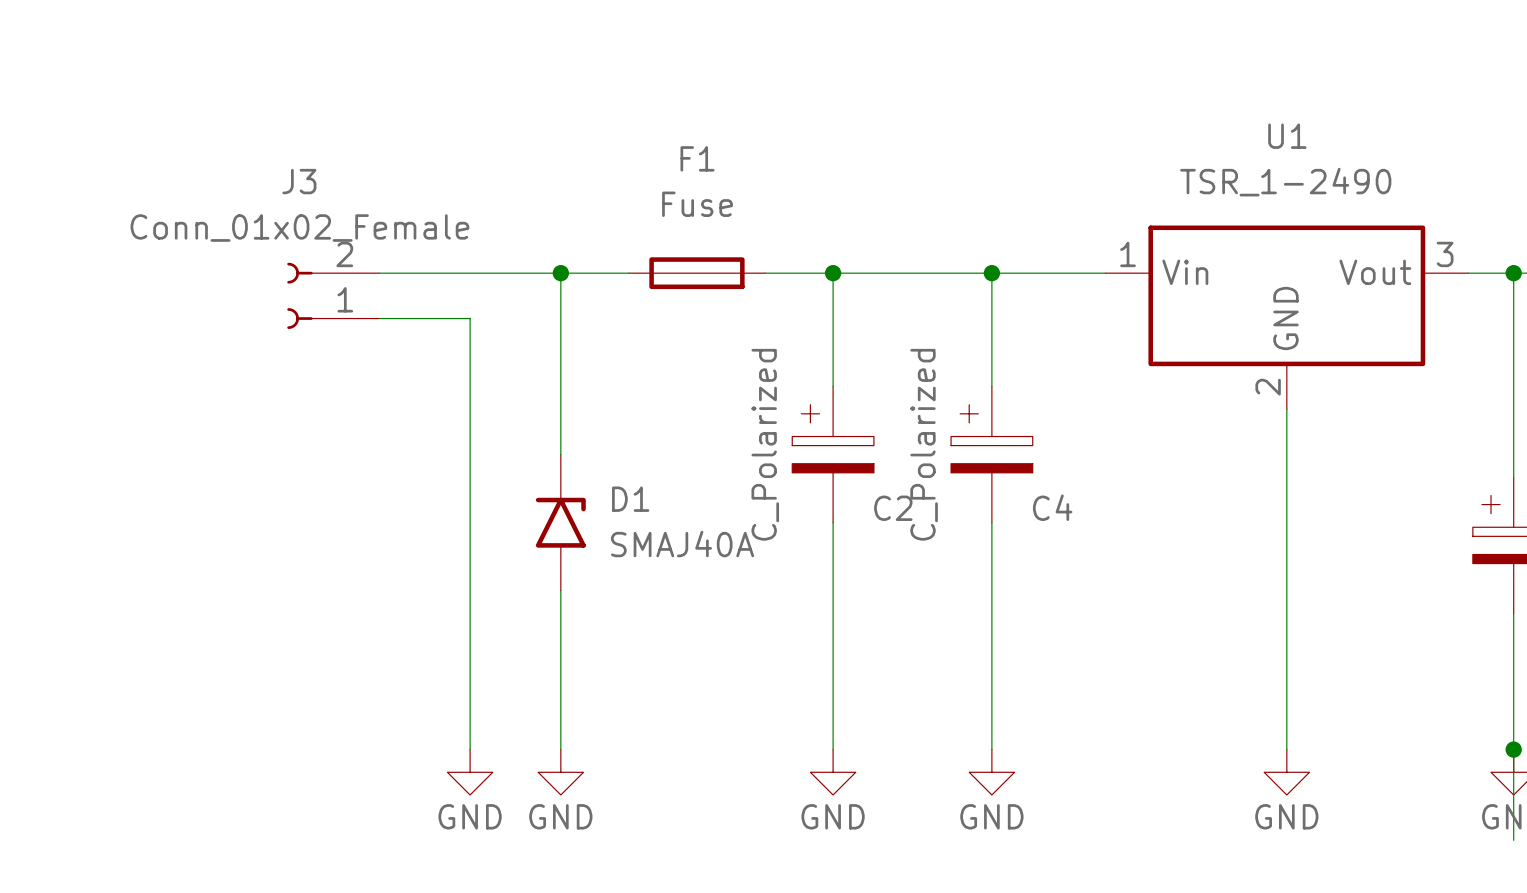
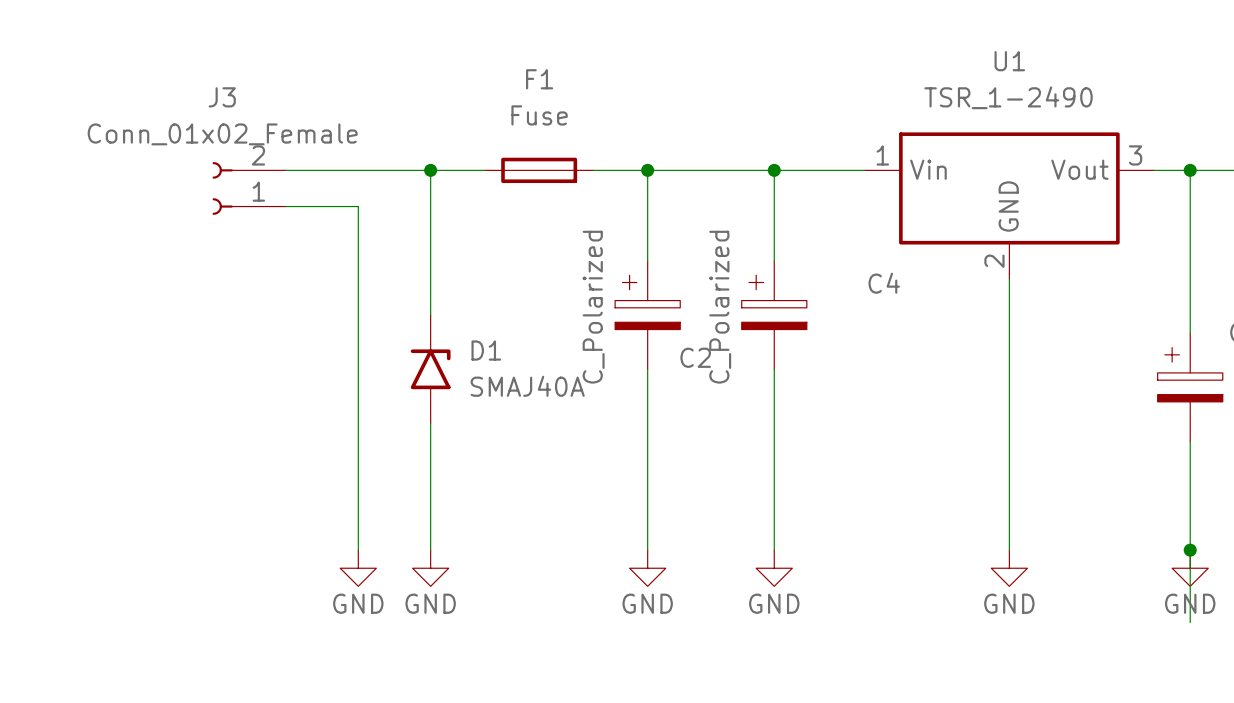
C4 name position: C4 (1052, 507) -> C4 (884, 283)

